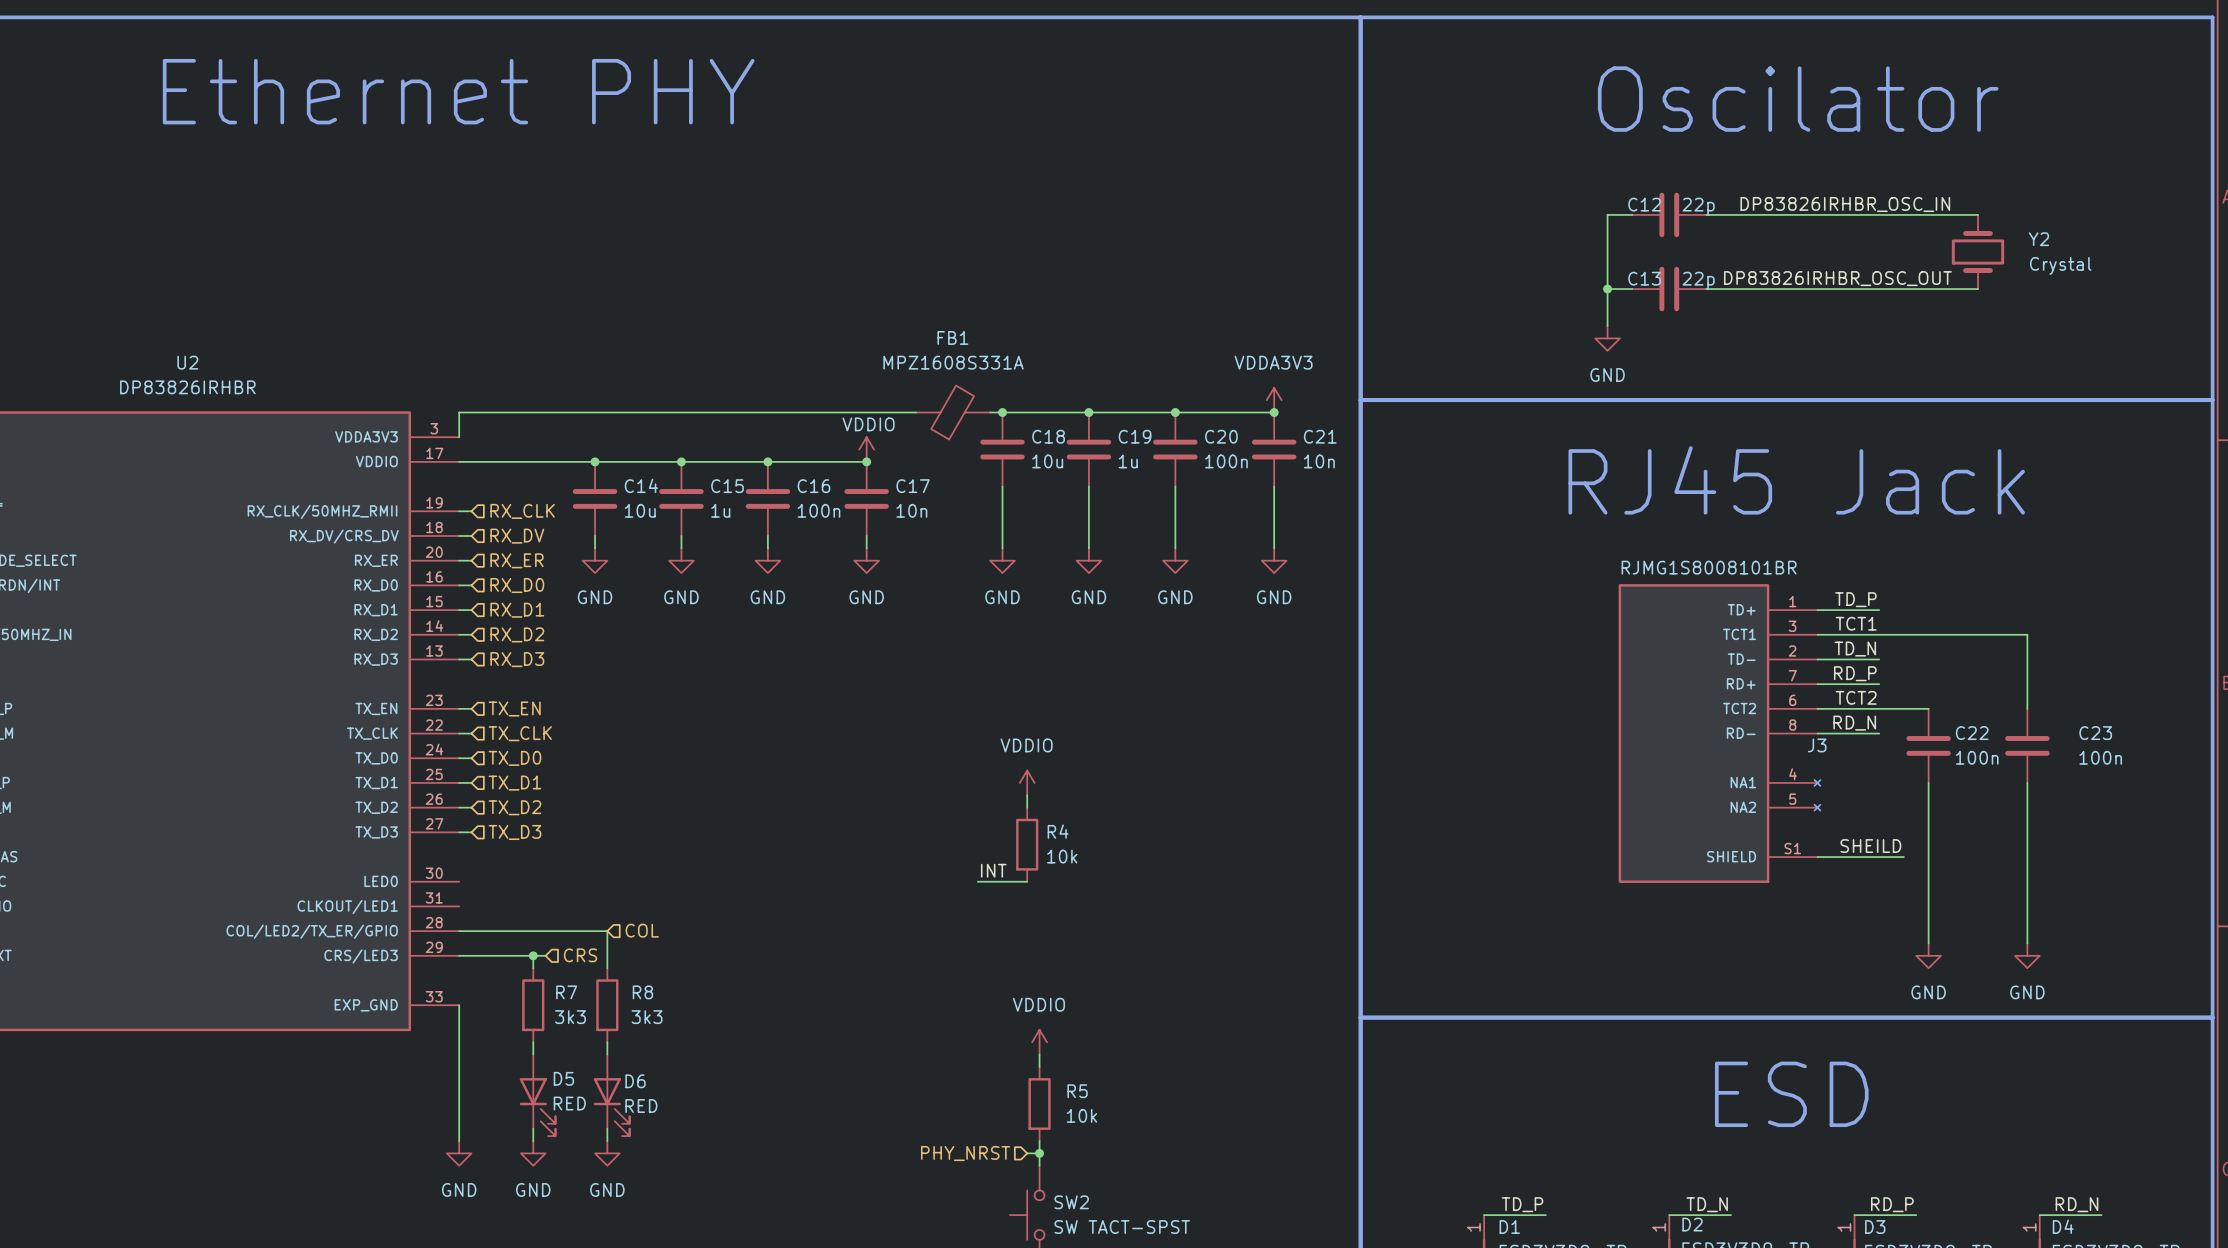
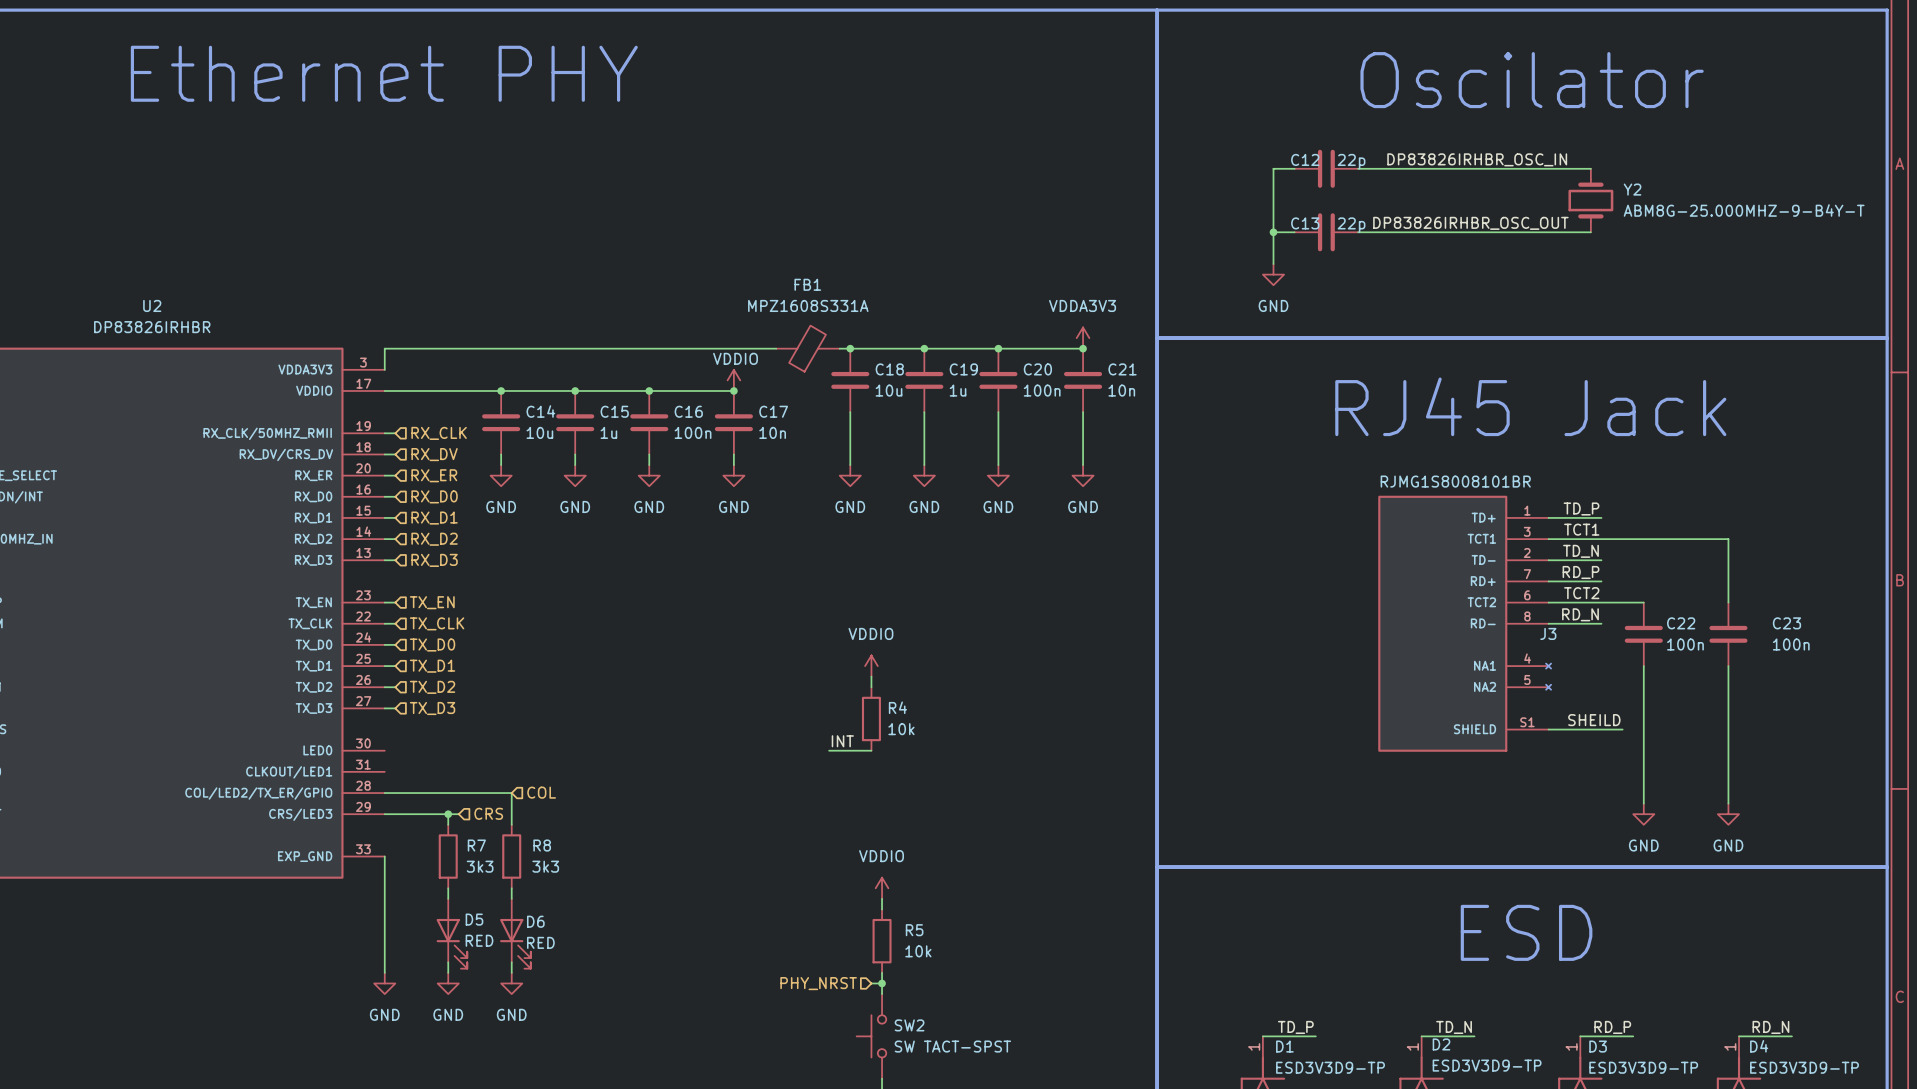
label position: DP83826IRHBR_OSC_IN (1845, 204) -> DP83826IRHBR_OSC_IN (1477, 159)
wire: (1632, 214) (1607, 214) (1607, 326) -> (1294, 168) (1273, 168) (1273, 264)
C12 position: (1669, 214) -> (1326, 168)
wire: (1706, 214) (1978, 214) -> (1358, 168) (1590, 168)
Y2 name position: Y2 (2038, 239) -> Y2 (1632, 189)
Y2 position: (1978, 251) -> (1590, 200)
Y2 value: Crystal (2060, 265) -> ABM8G-25.000MHZ-9-B4Y-T (1744, 210)
junction: none -> (1273, 232)
label position: DP83826IRHBR_OSC_OUT (1837, 278) -> DP83826IRHBR_OSC_OUT (1470, 223)
wire: (1607, 289) (1632, 289) -> (1273, 232) (1294, 232)
junction: (1607, 289) -> none
C13 position: (1669, 289) -> (1326, 232)
wire: (1706, 289) (1978, 289) -> (1358, 232) (1590, 232)
power symbol position: GND (1607, 338) -> GND (1273, 274)

